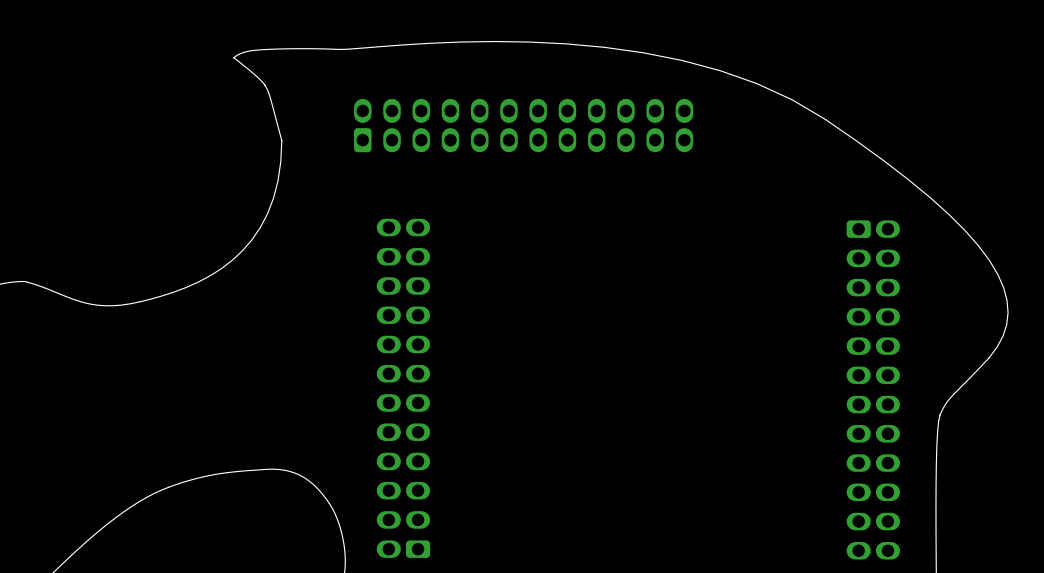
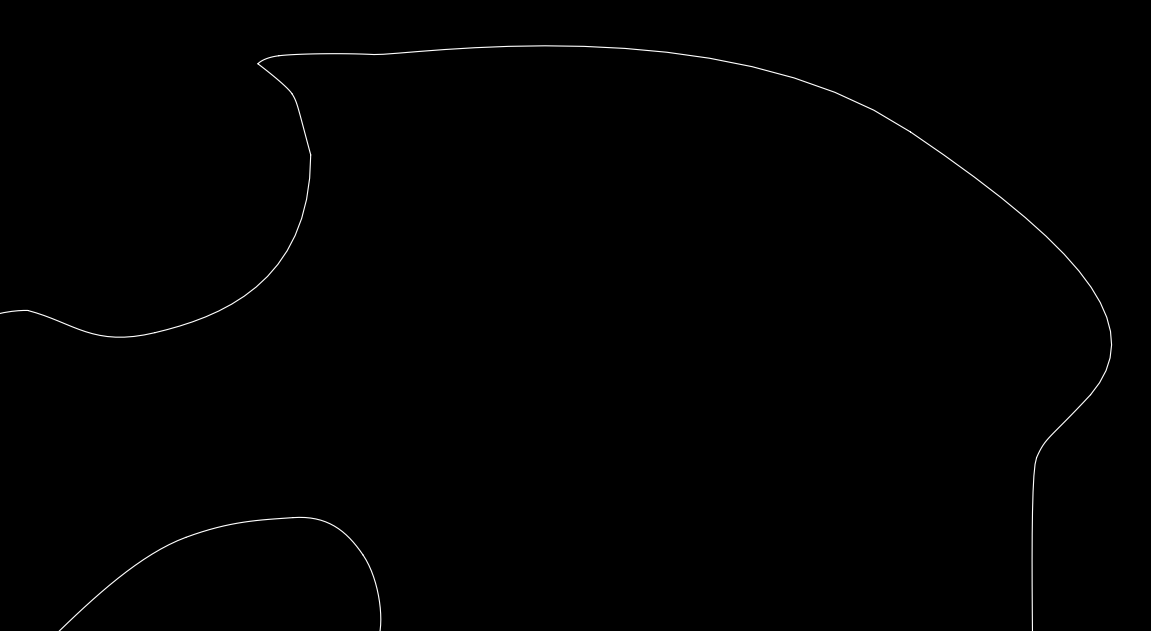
part: (523, 125) -> none
part: (403, 388) -> none
part: (873, 389) -> none

